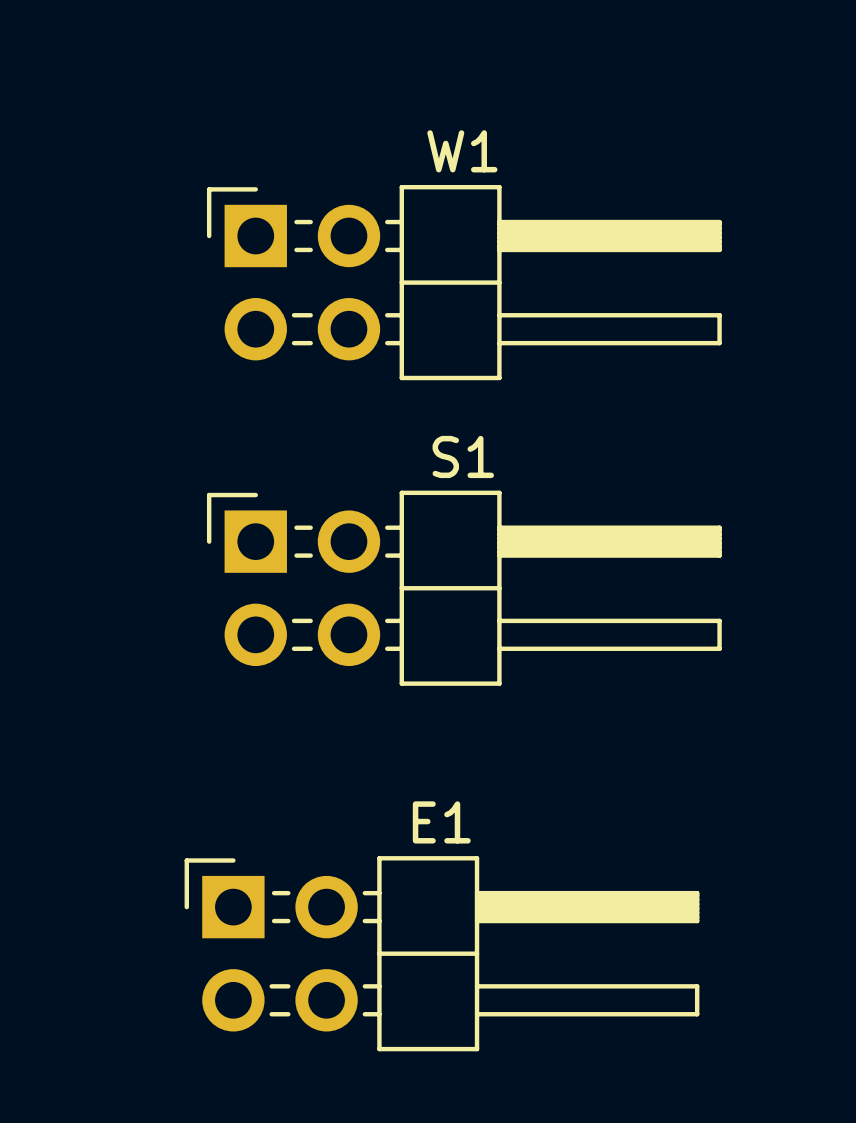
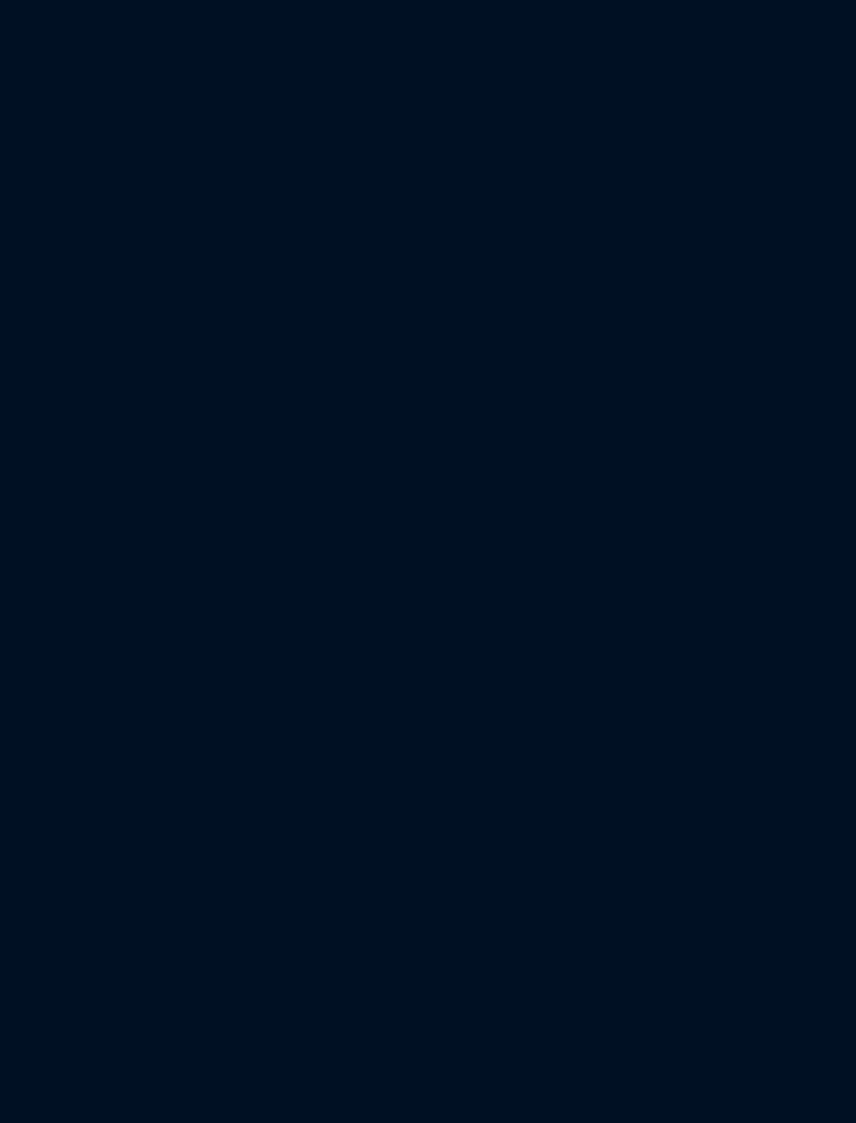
W1: (464, 282) -> none
S1: (464, 588) -> none
E1: (441, 953) -> none

